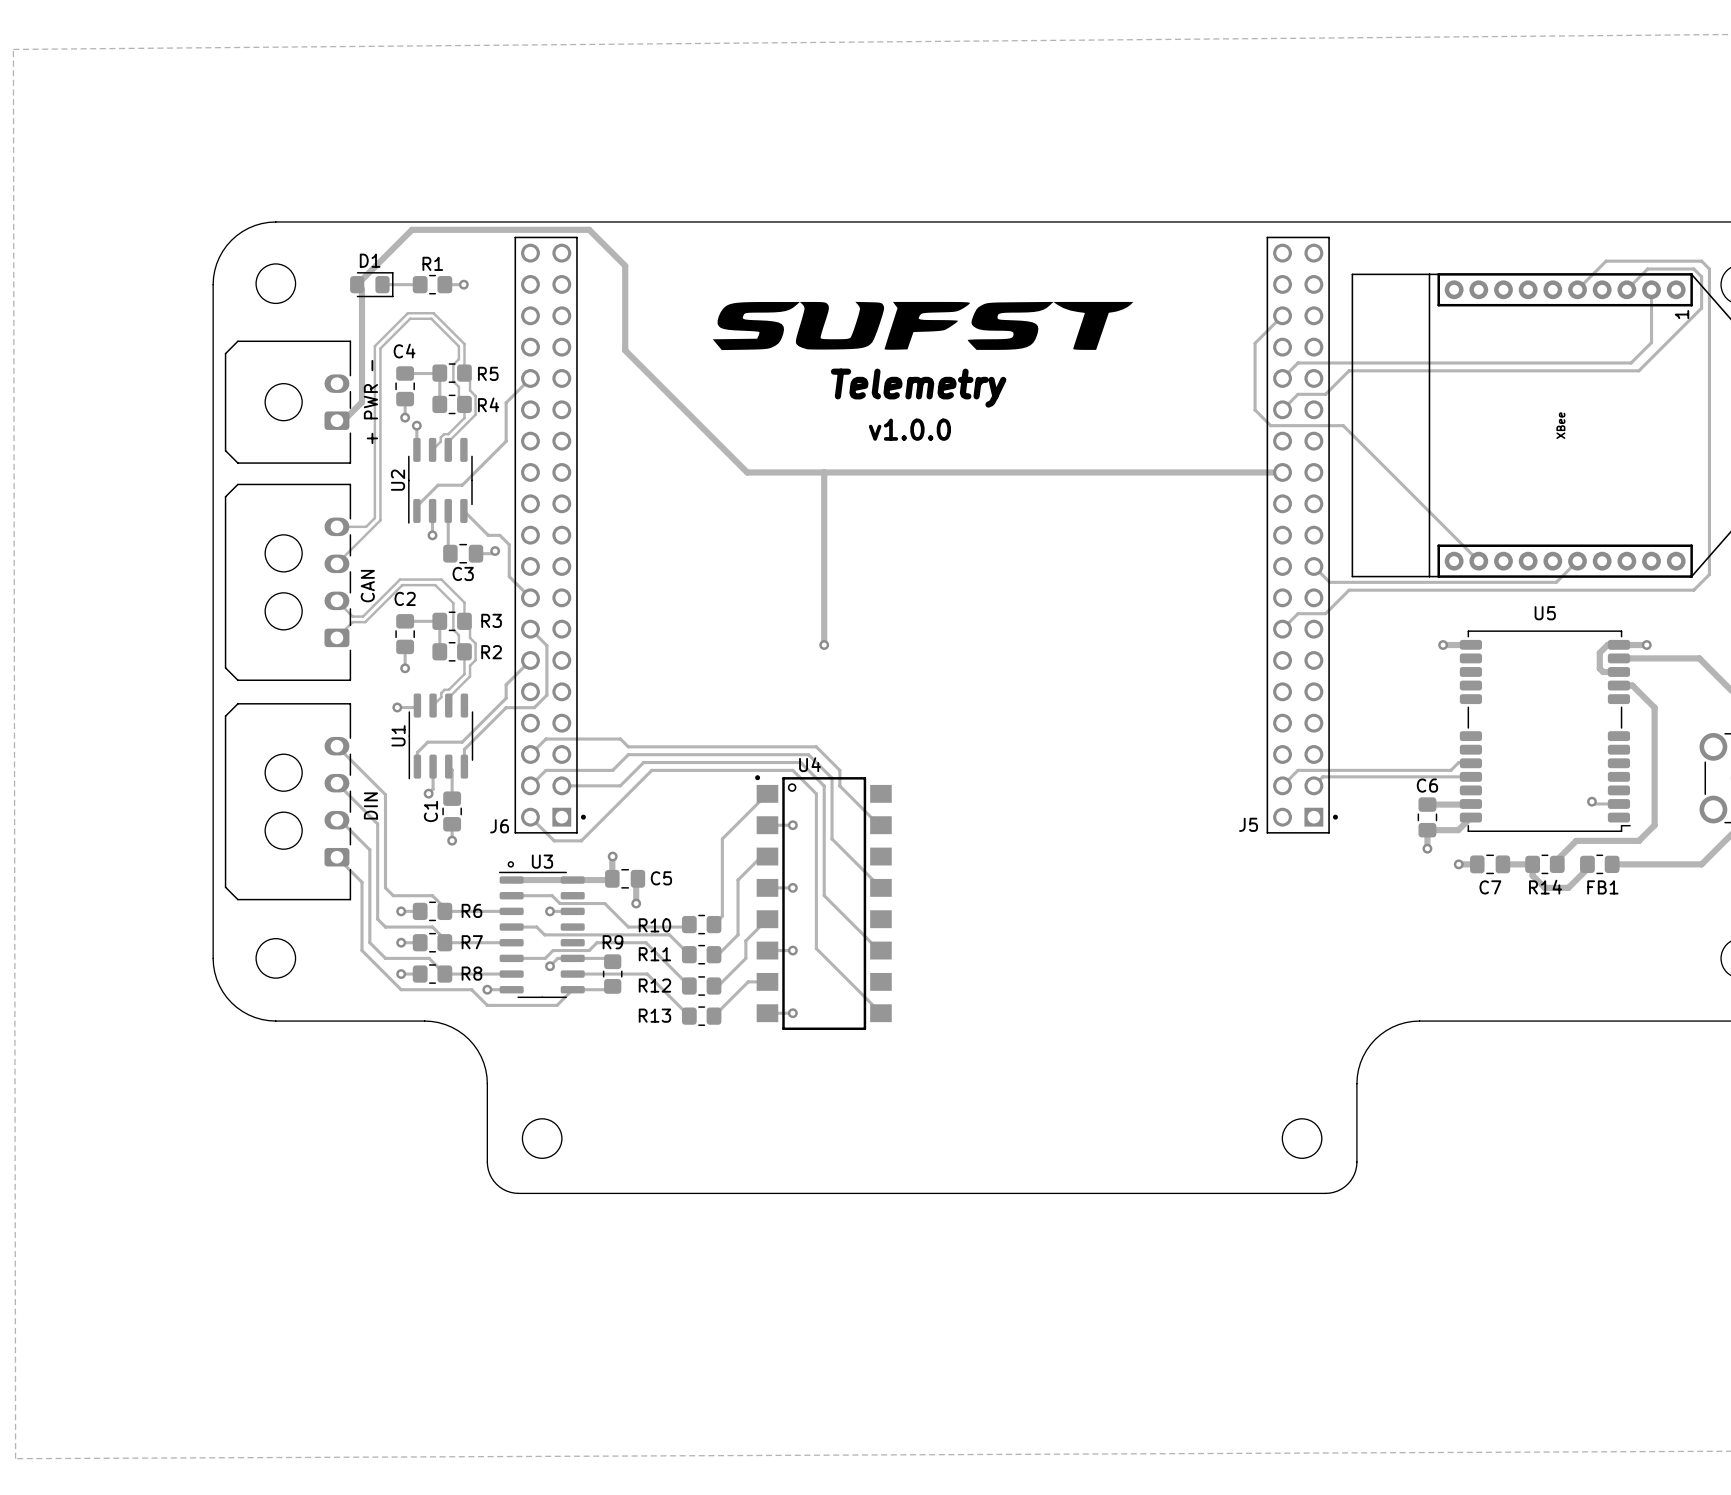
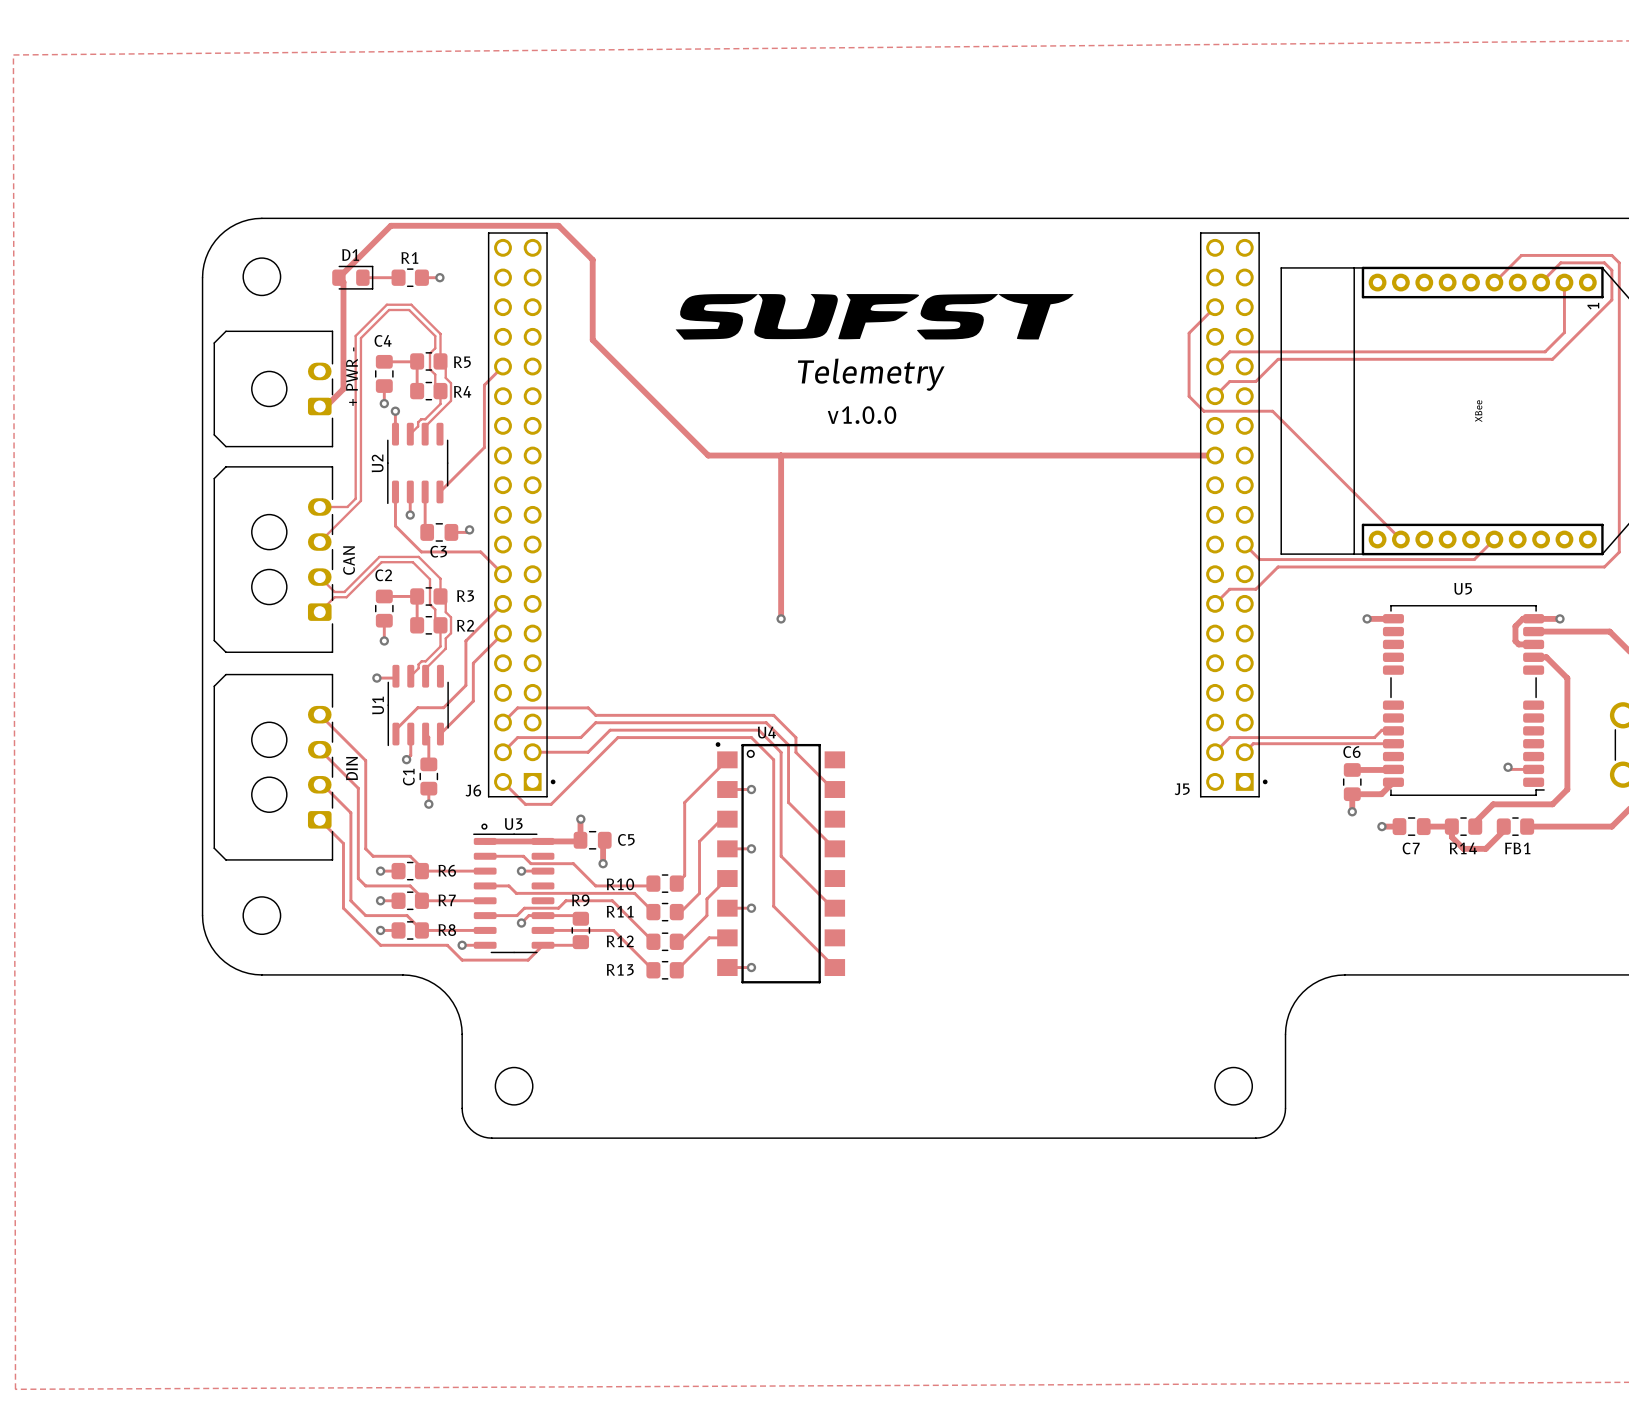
track: (510, 398) (506, 402) (506, 441) (462, 485) (438, 485) (416, 506) (416, 510) -> (484, 385) (484, 447) (439, 491)
track: (463, 510) (488, 535) (499, 535) (509, 544) (509, 576) -> (395, 491) (395, 526) (421, 551) (480, 551) (482, 554)
track: (530, 629) (546, 645) (546, 695) (534, 707) (506, 707) (464, 749) (464, 766) -> (503, 603) (465, 640) (465, 685) (443, 707) (417, 707) (395, 729)
track: (506, 684) (506, 698) (462, 742) (427, 742) (417, 752) (417, 761) -> (479, 656) (473, 663) (473, 701) (440, 734)

